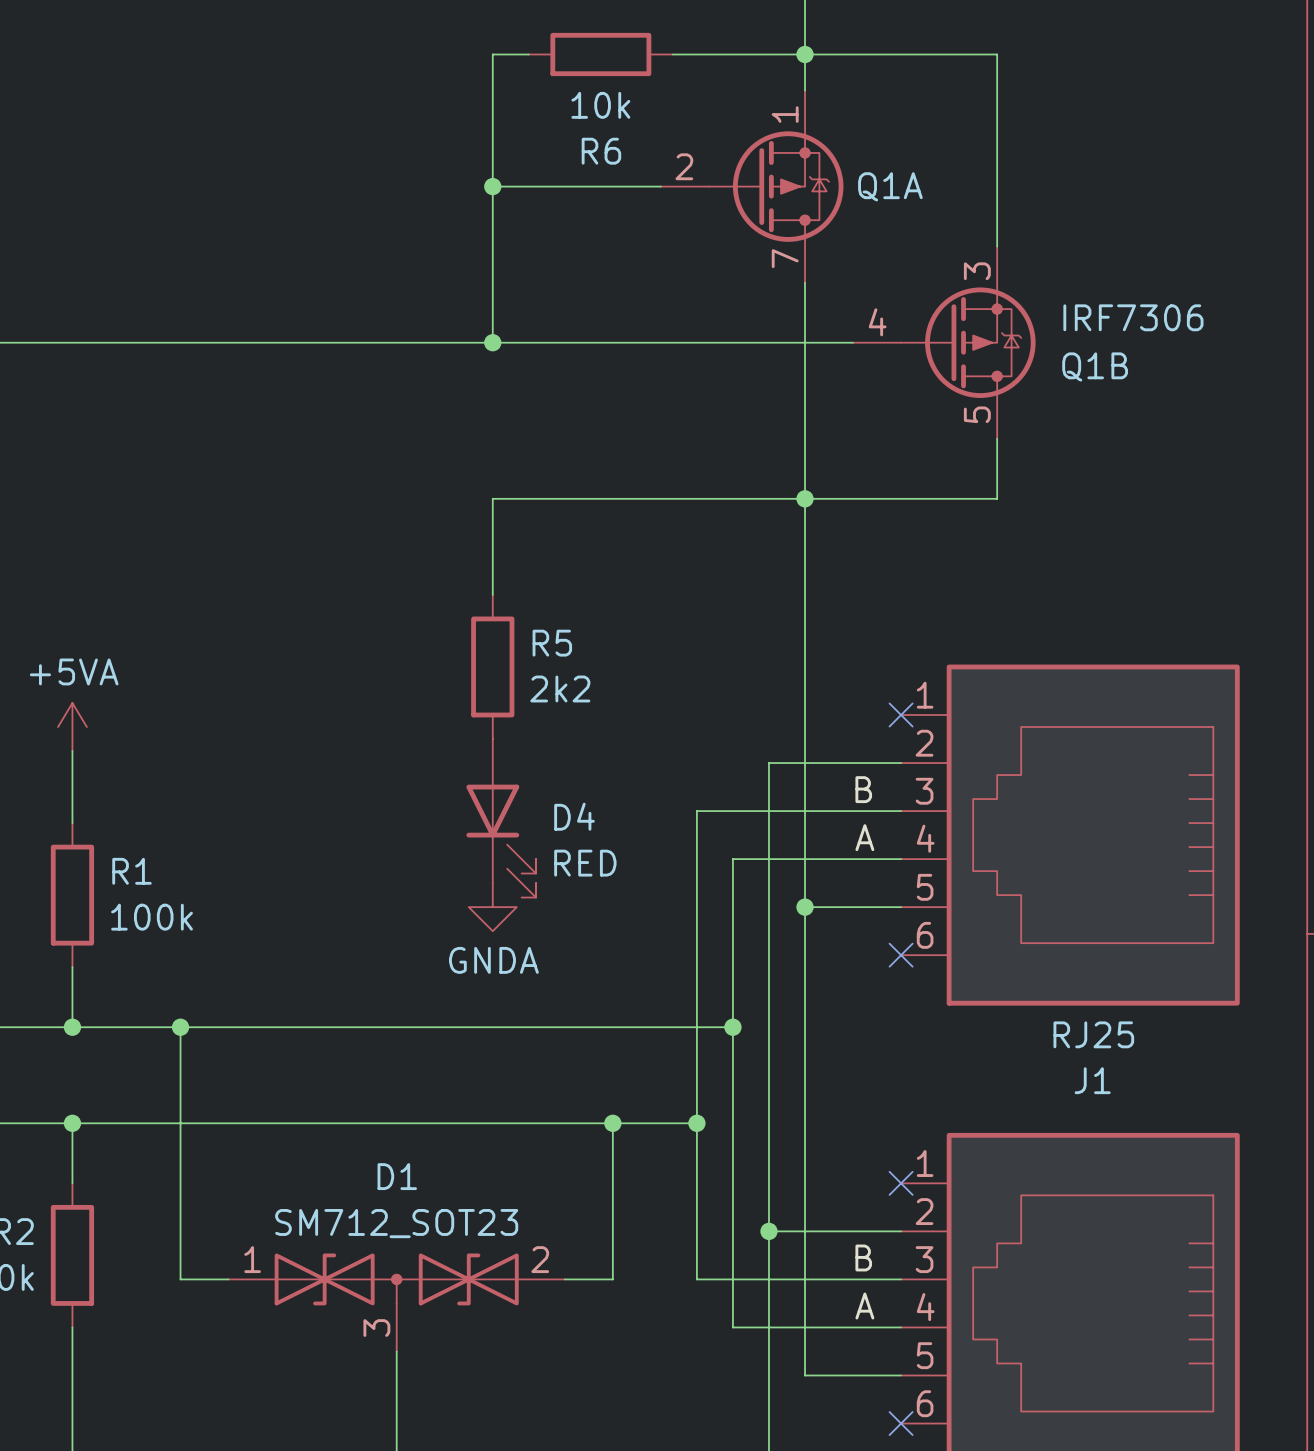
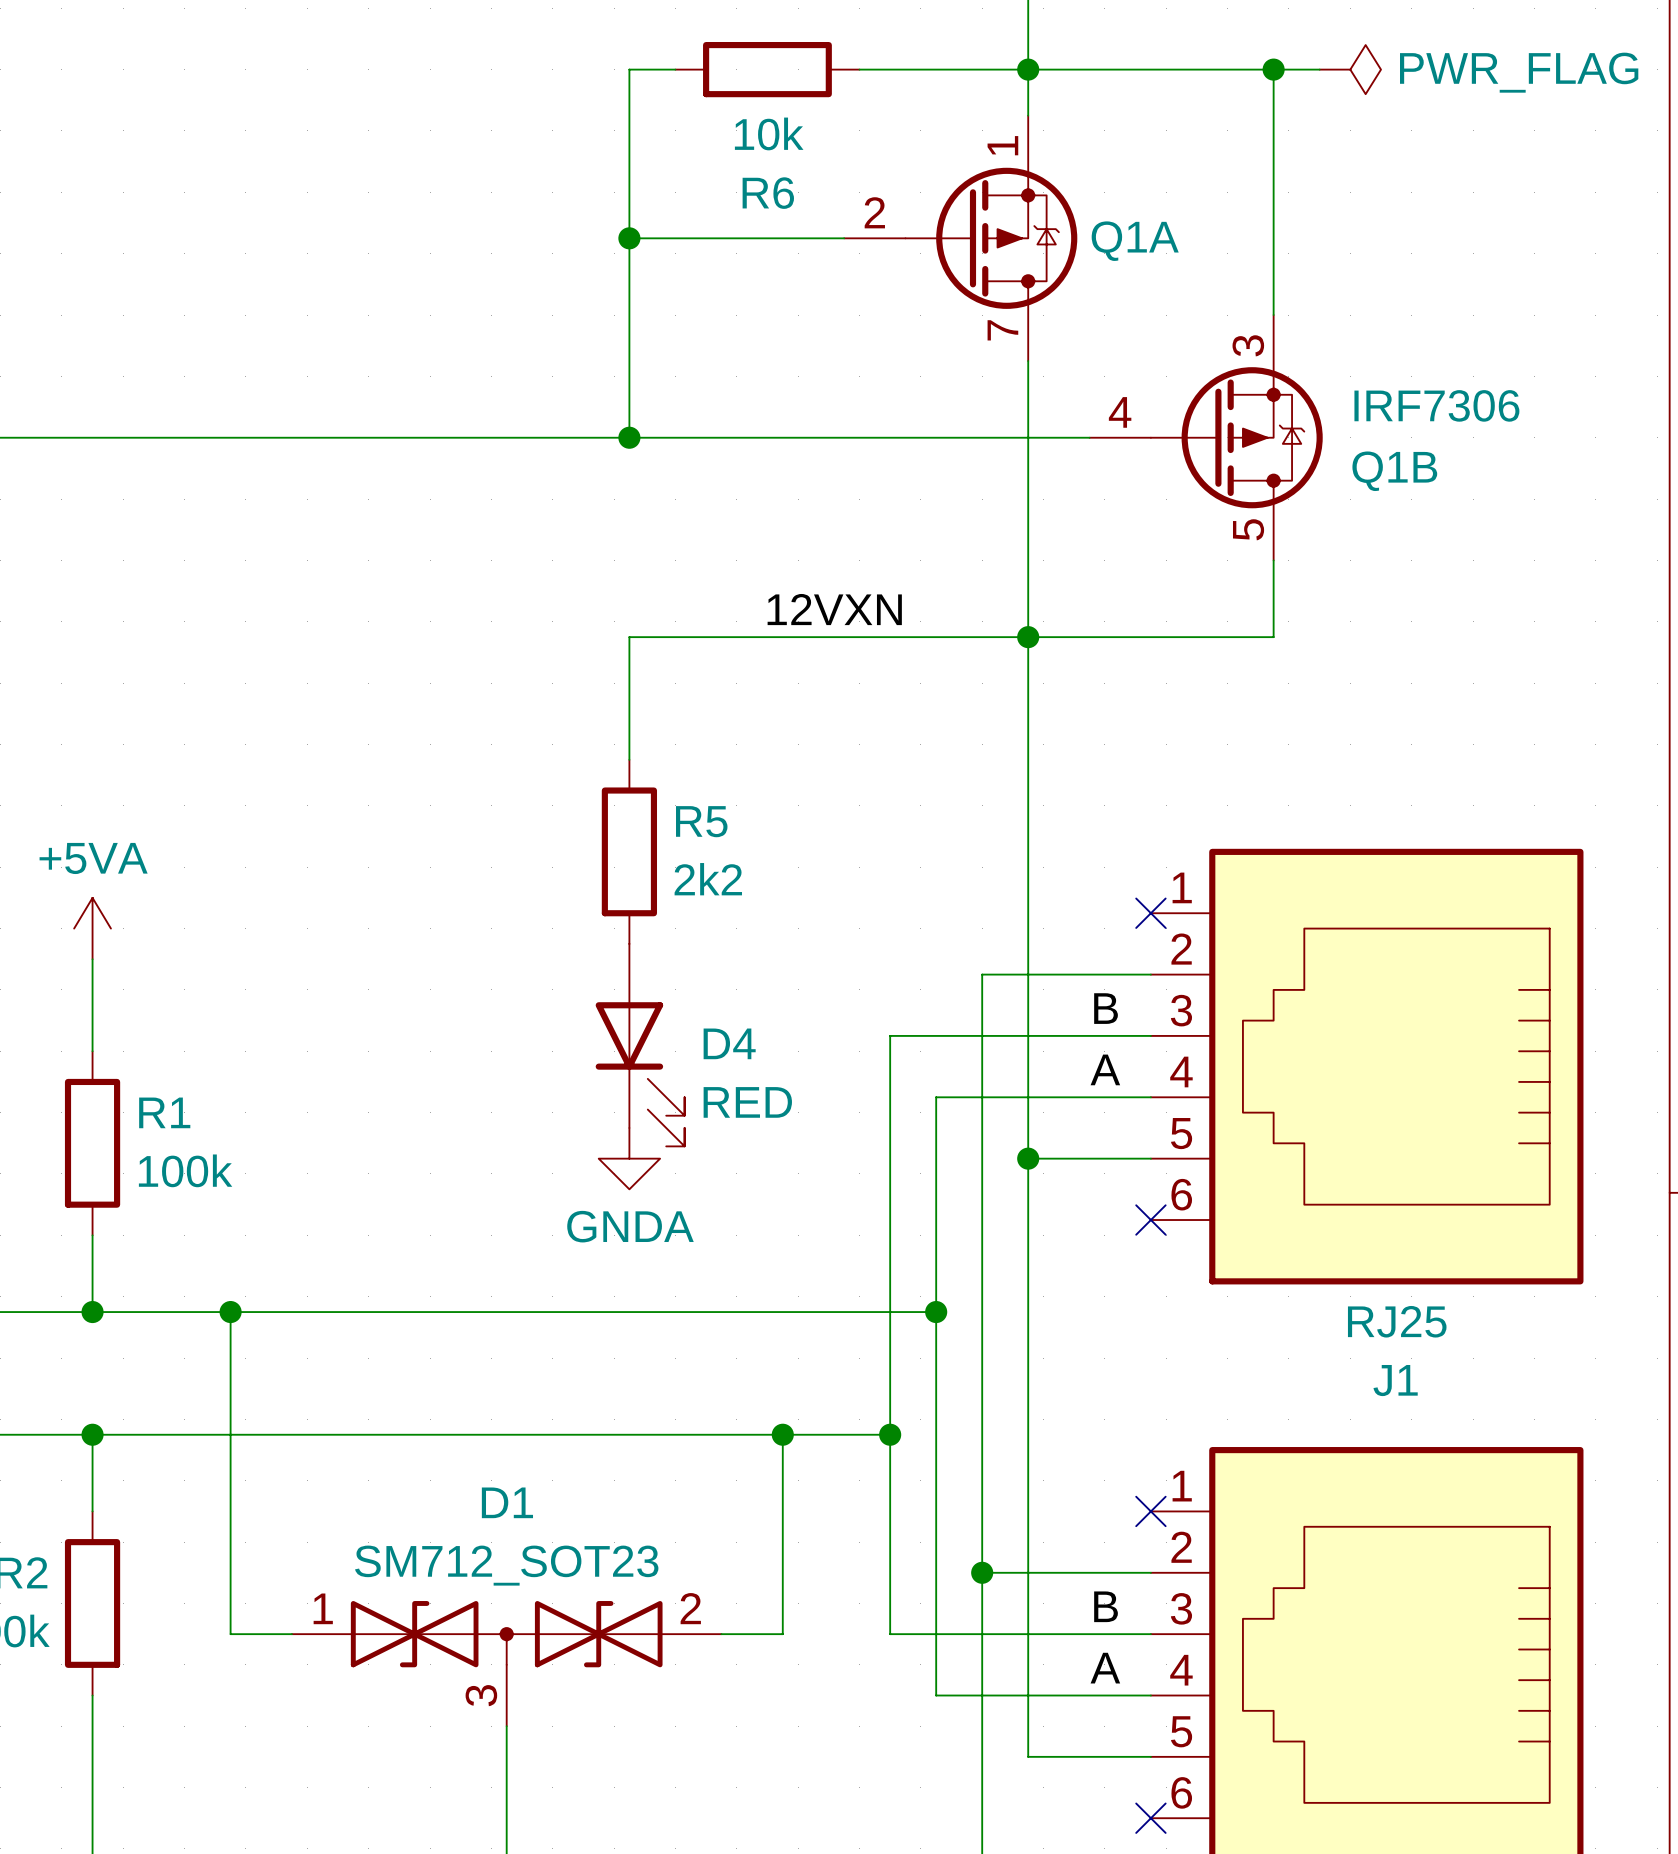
wire: none -> (1273, 69) (1319, 69)
junction: none -> (1273, 69)
power symbol: none -> PWR_FLAG (1350, 69)
label: none -> 12VXN (834, 609)

